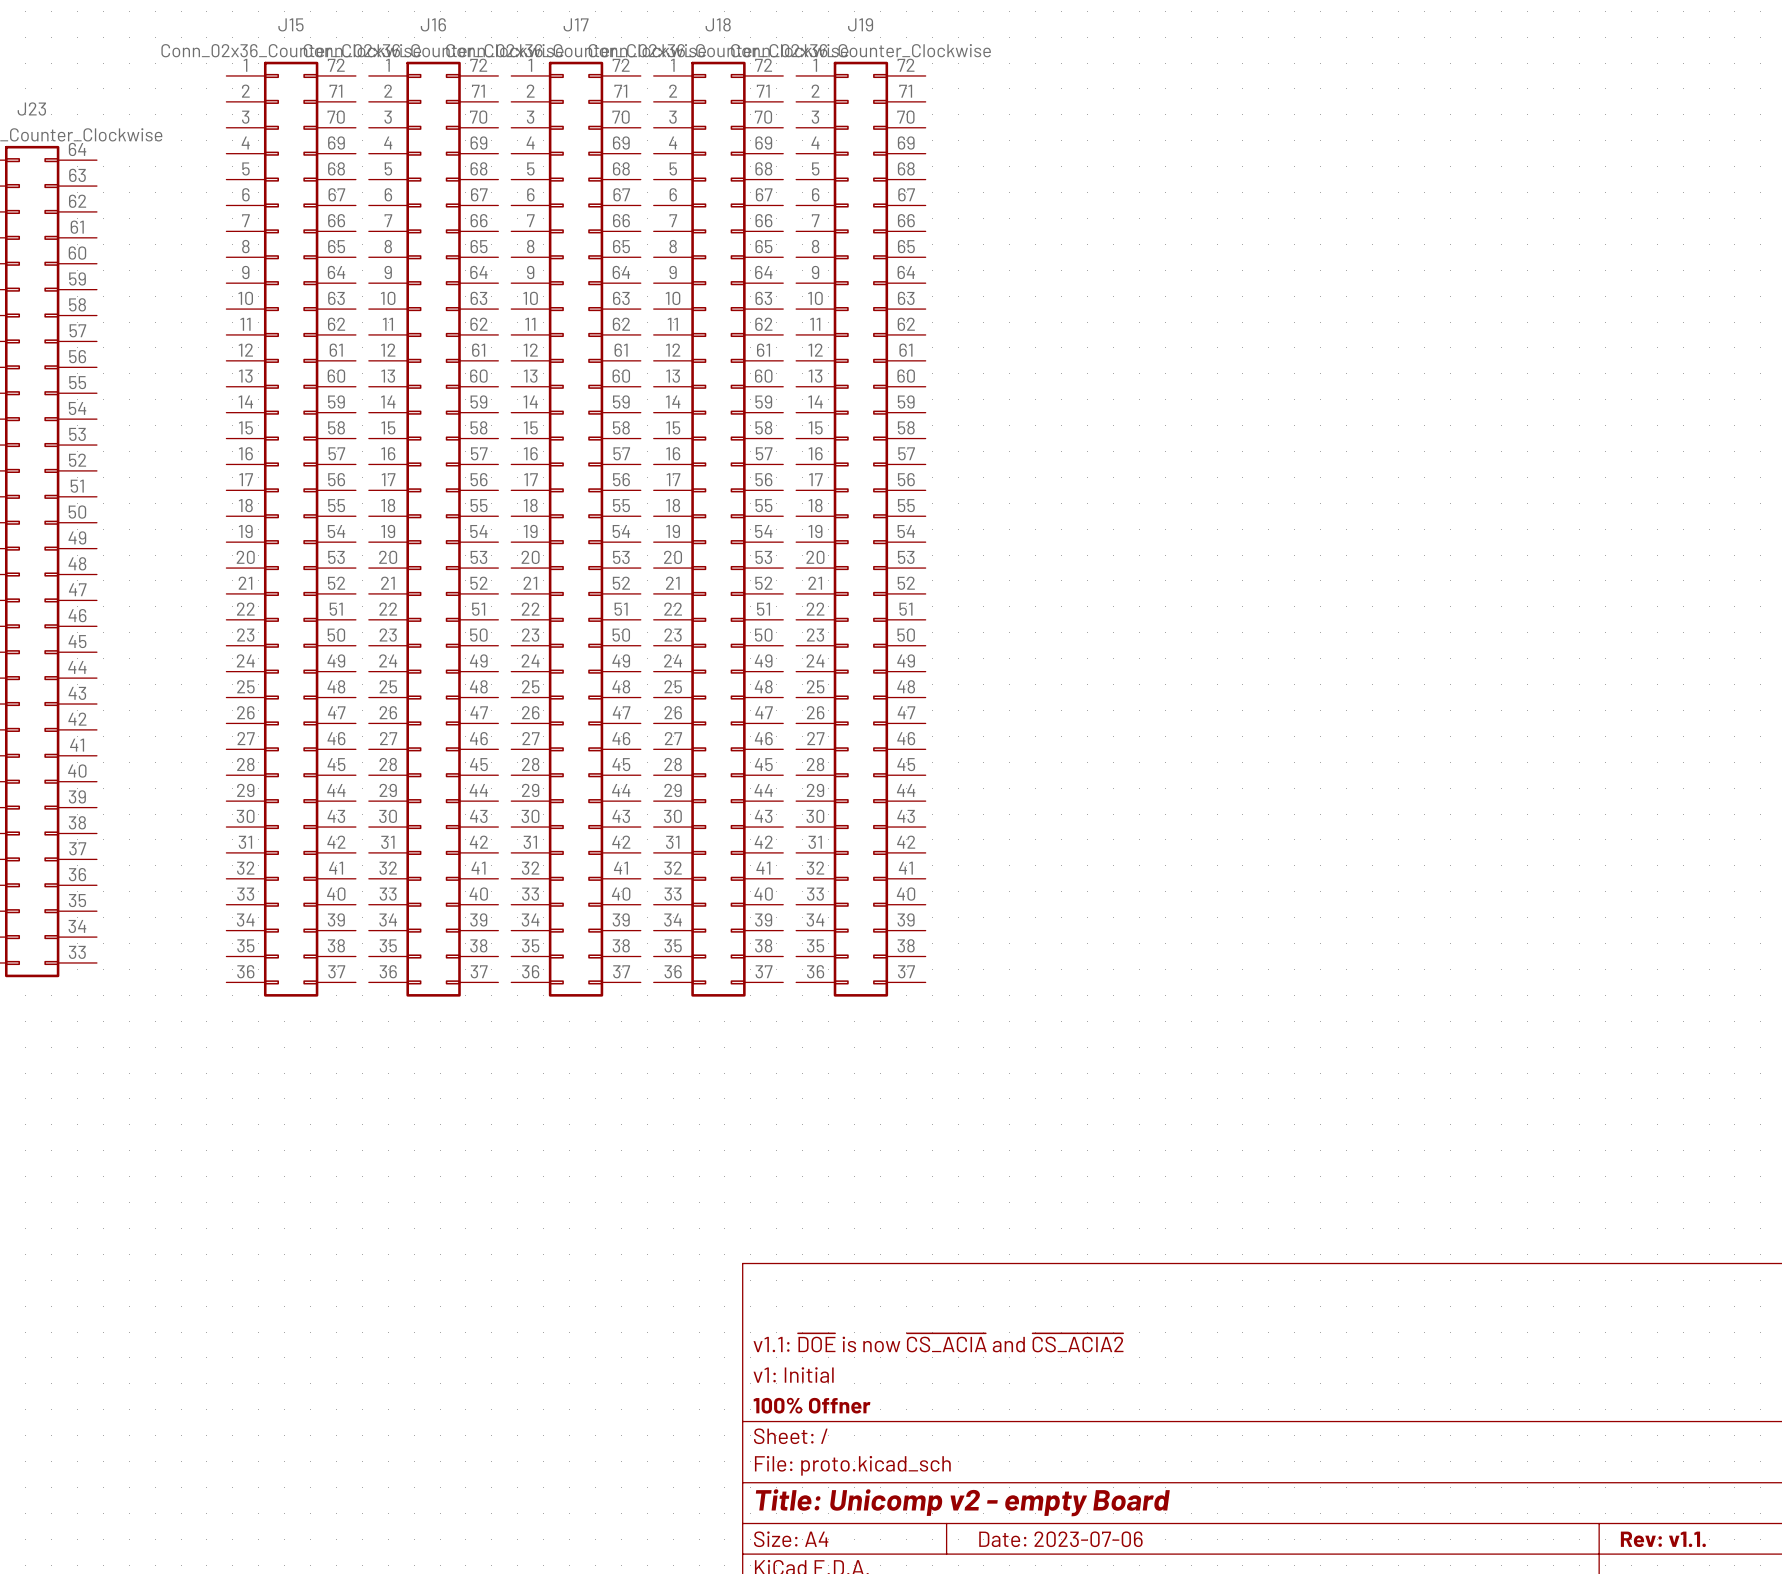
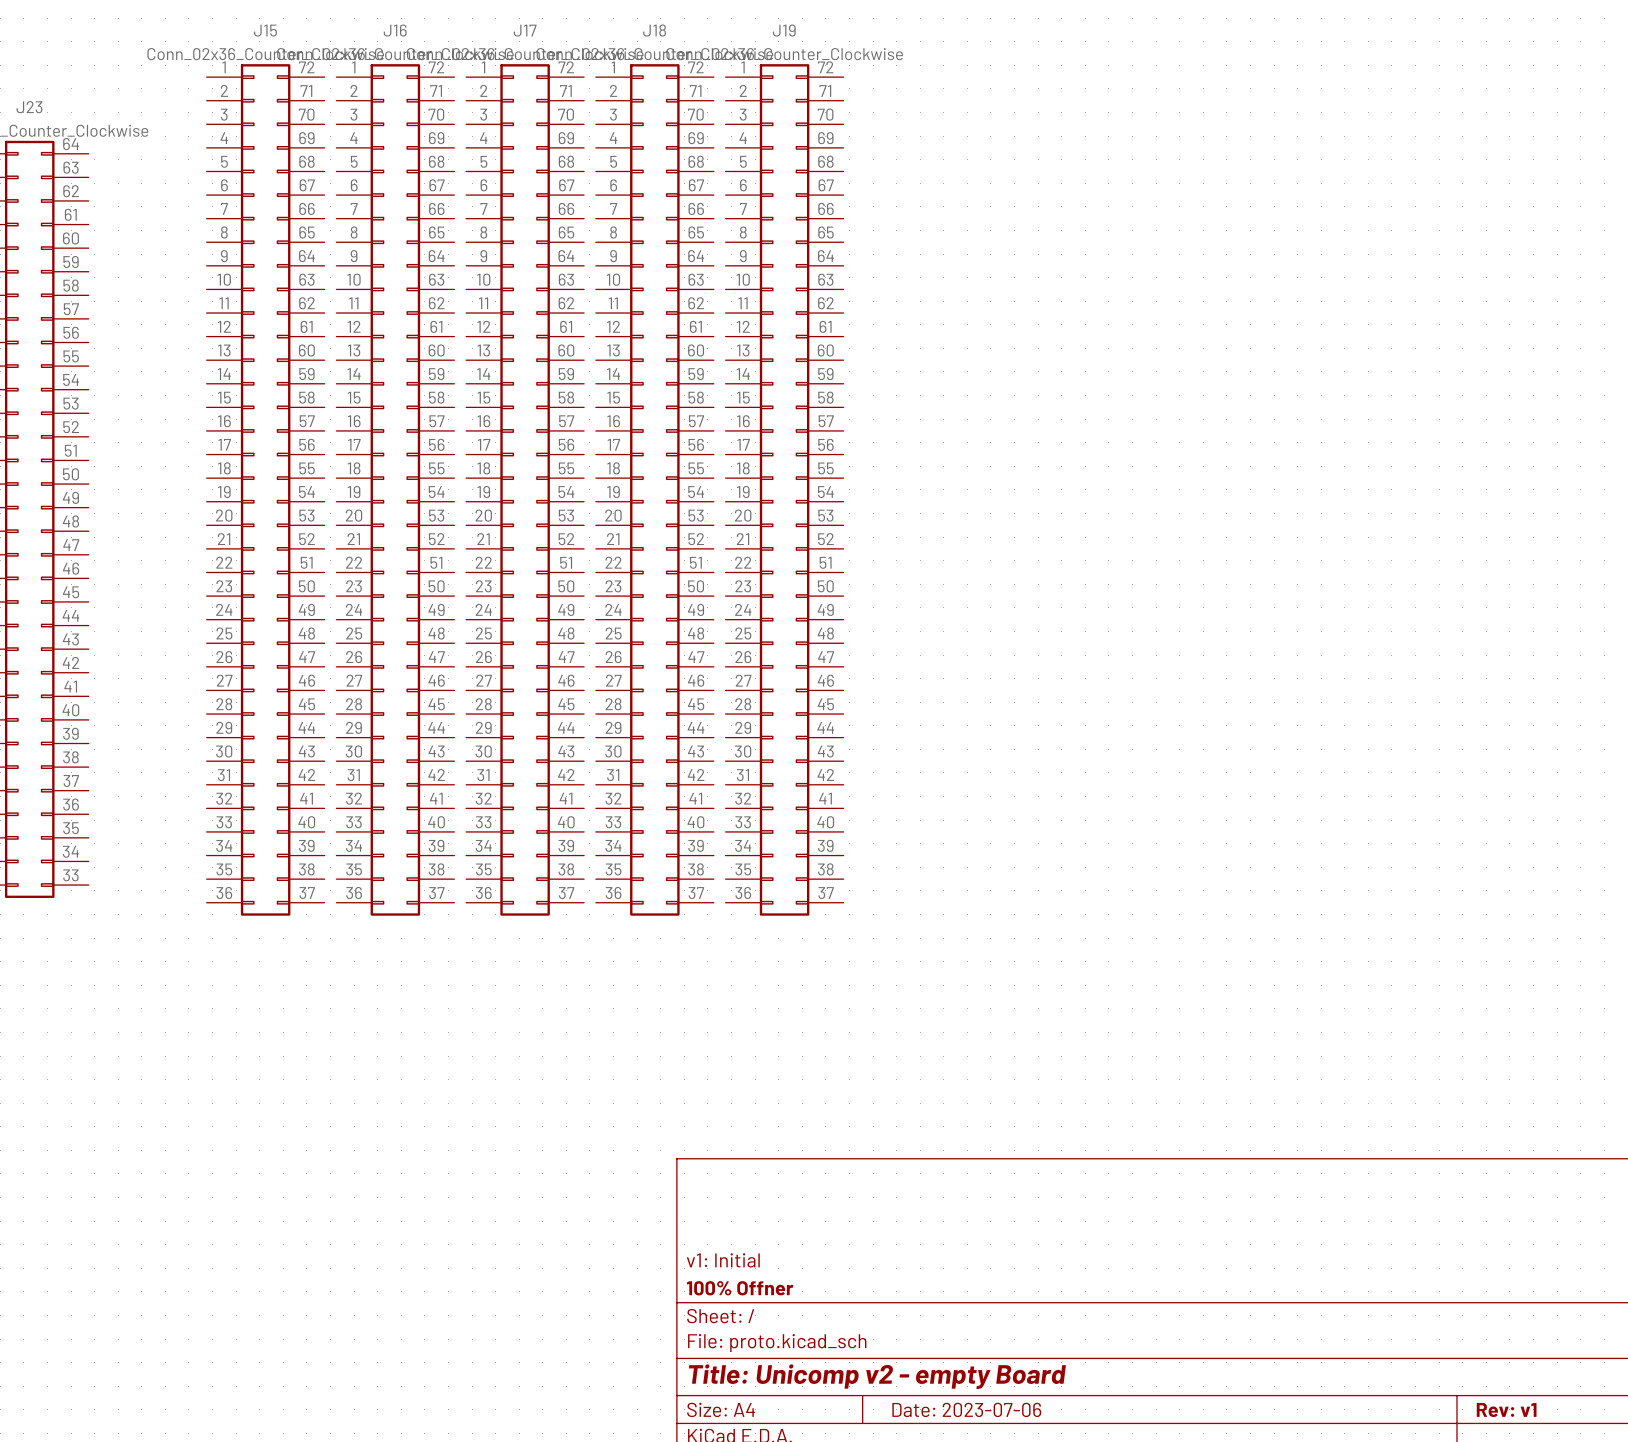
title block: v1.1: ~{DOE} is now ~{CS_ACIA} and ~{CS_ACIA2} (938, 1342) -> none
title block: Rev: v1.1. (1663, 1539) -> Rev: v1 (1506, 1409)

